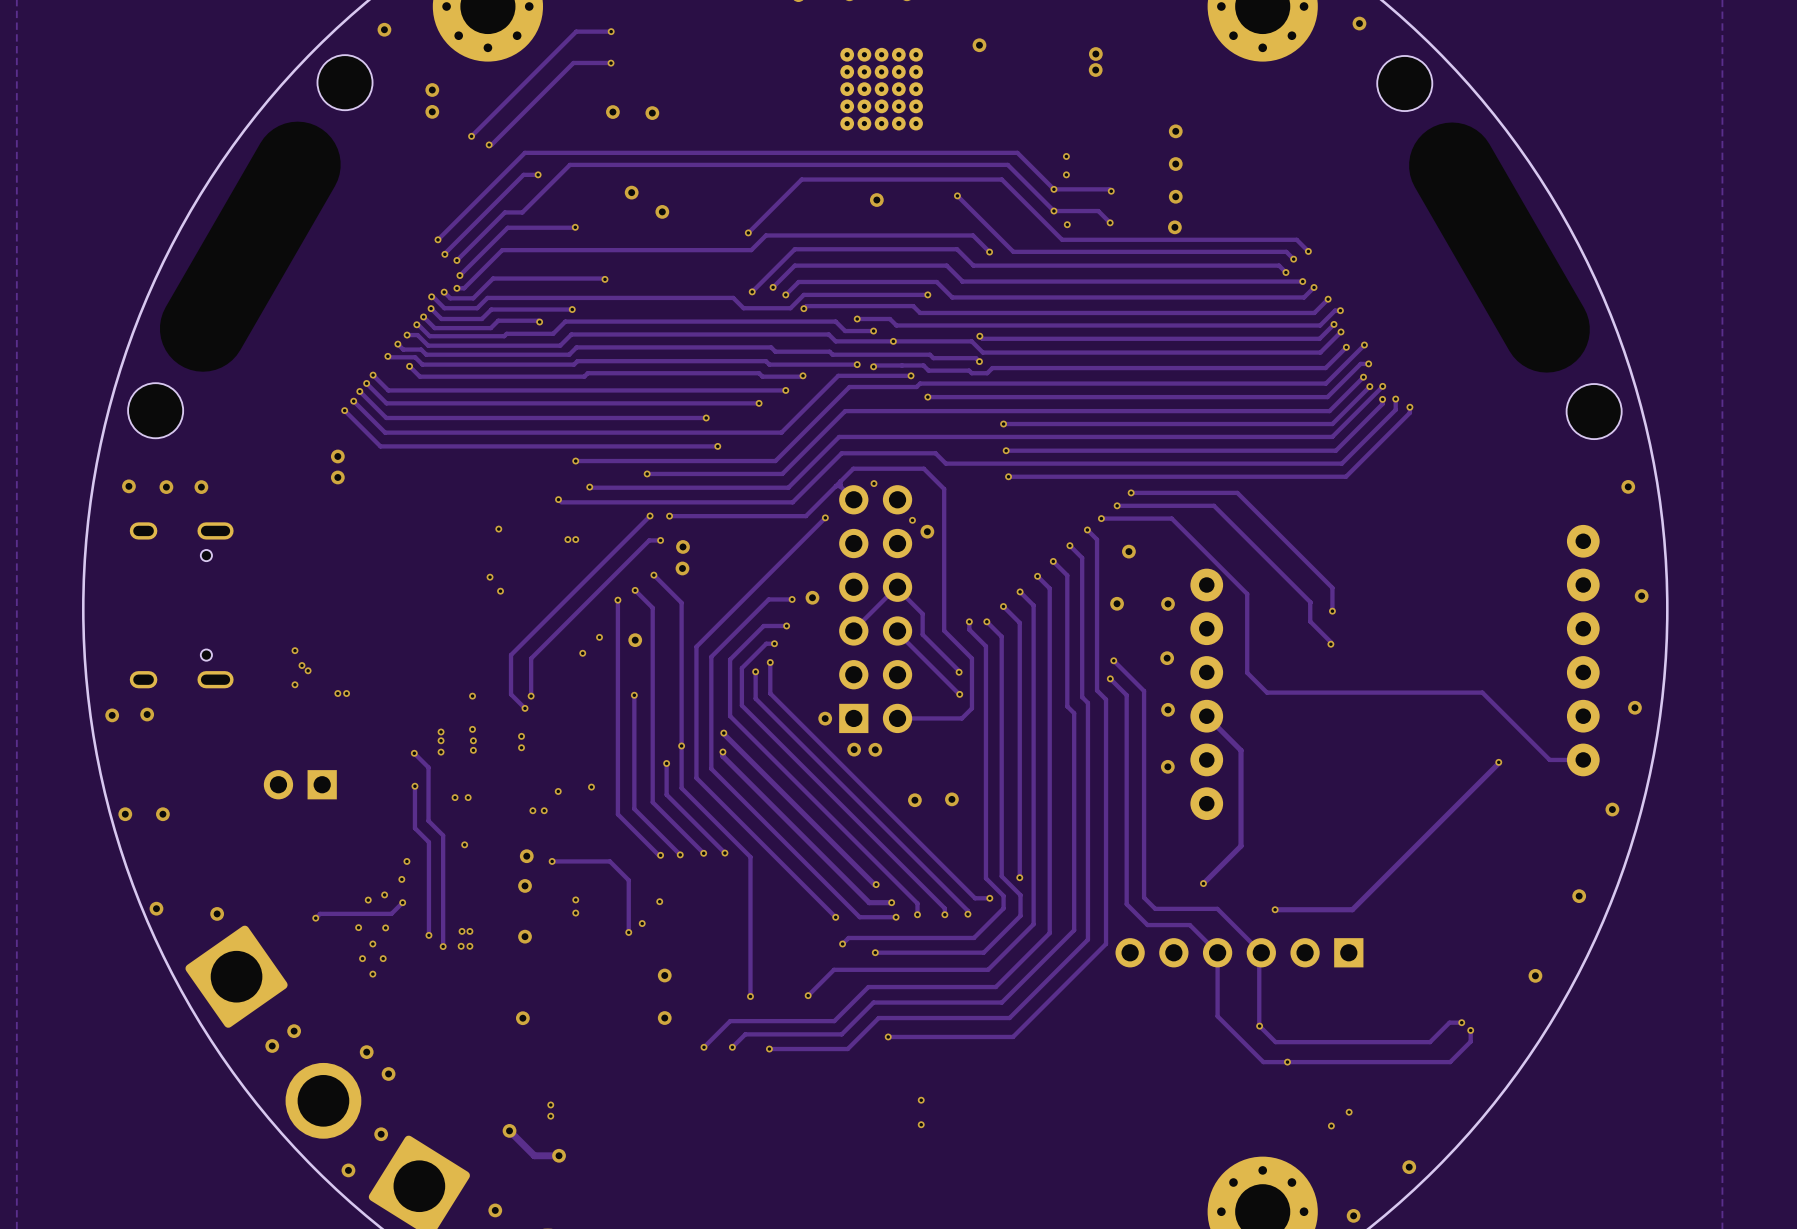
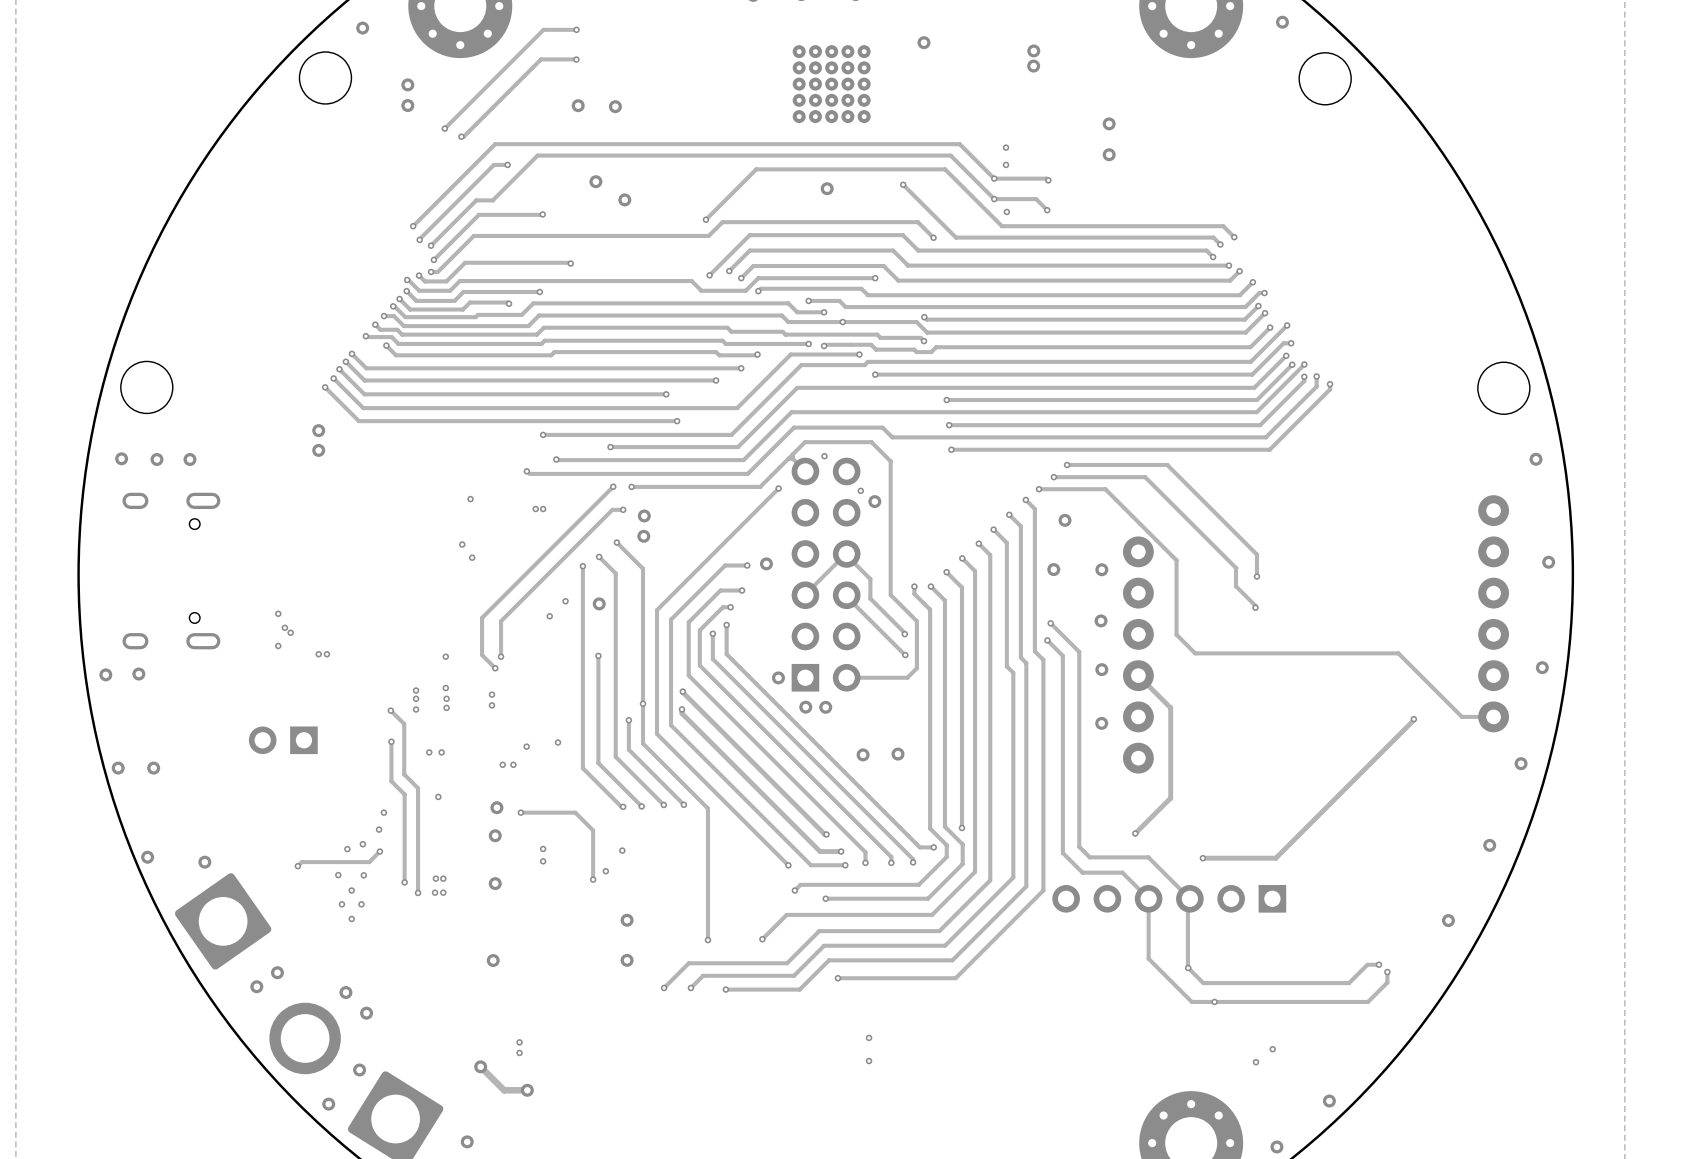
via: (1175, 196) -> none
via: (1174, 227) -> none

